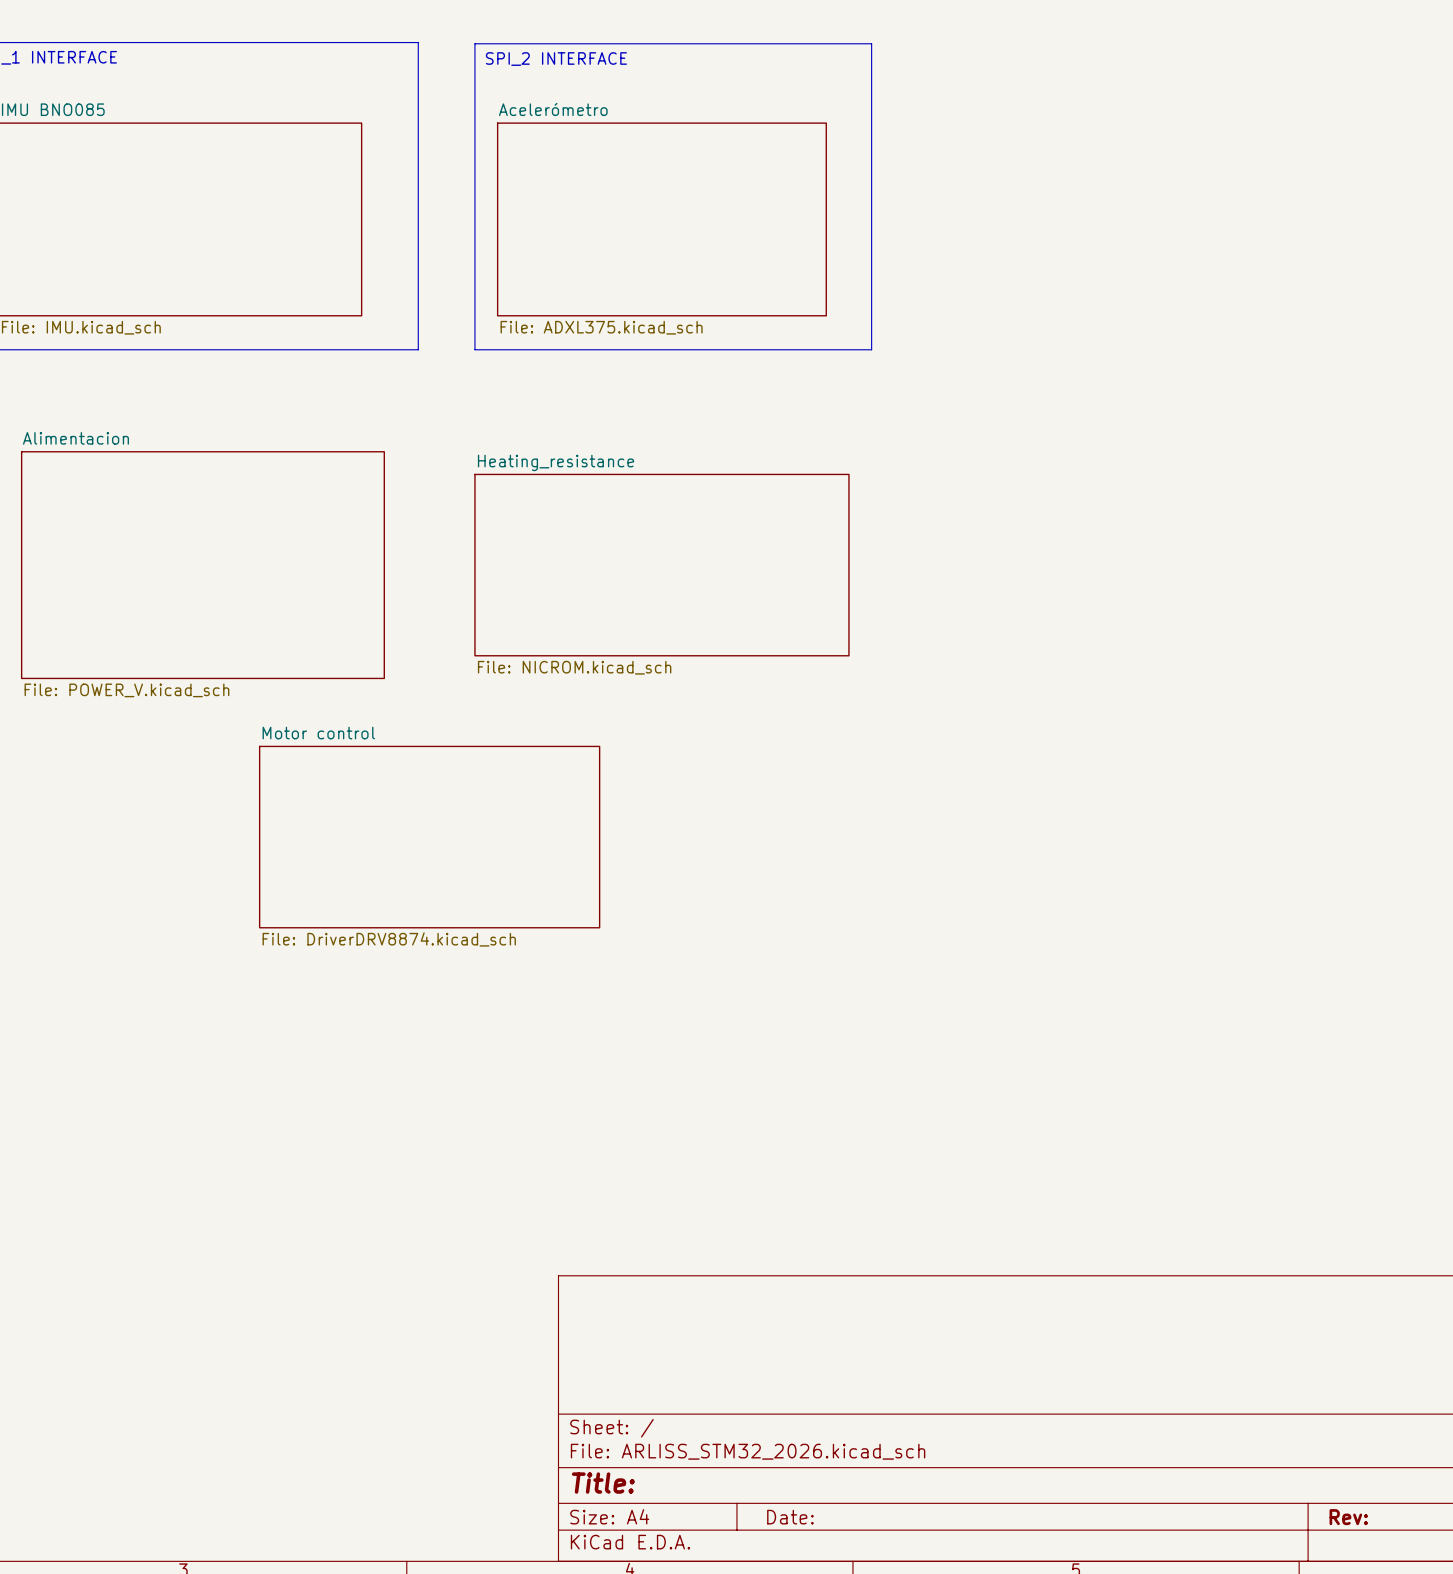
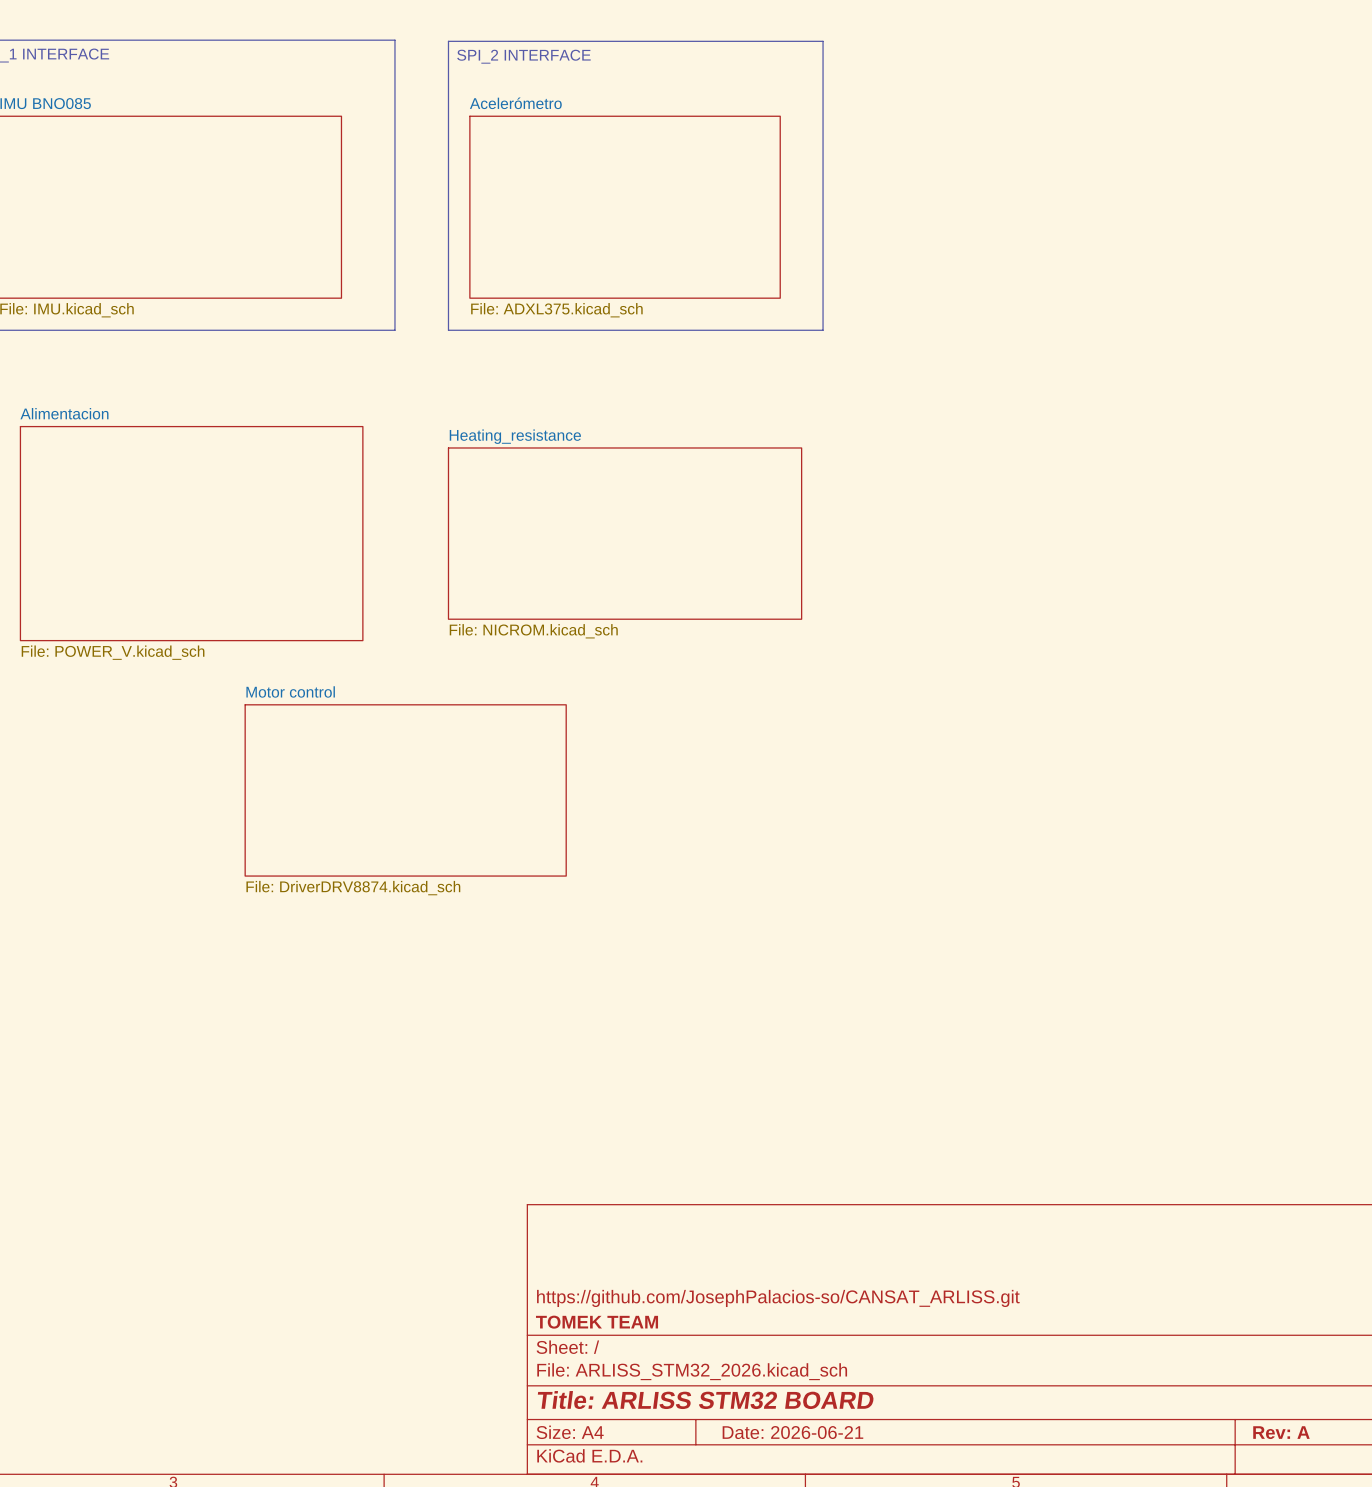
title block: none -> https://github.com/JosephPalacios-so/CANSAT_ARLISS.git (778, 1298)
title block: none -> TOMEK TEAM (597, 1322)
title block: Title: (603, 1483) -> Title: ARLISS STM32 BOARD (705, 1400)
title block: Date: (790, 1517) -> Date: 2026-06-21 (792, 1432)
title block: Rev: (1348, 1517) -> Rev: A (1281, 1432)

